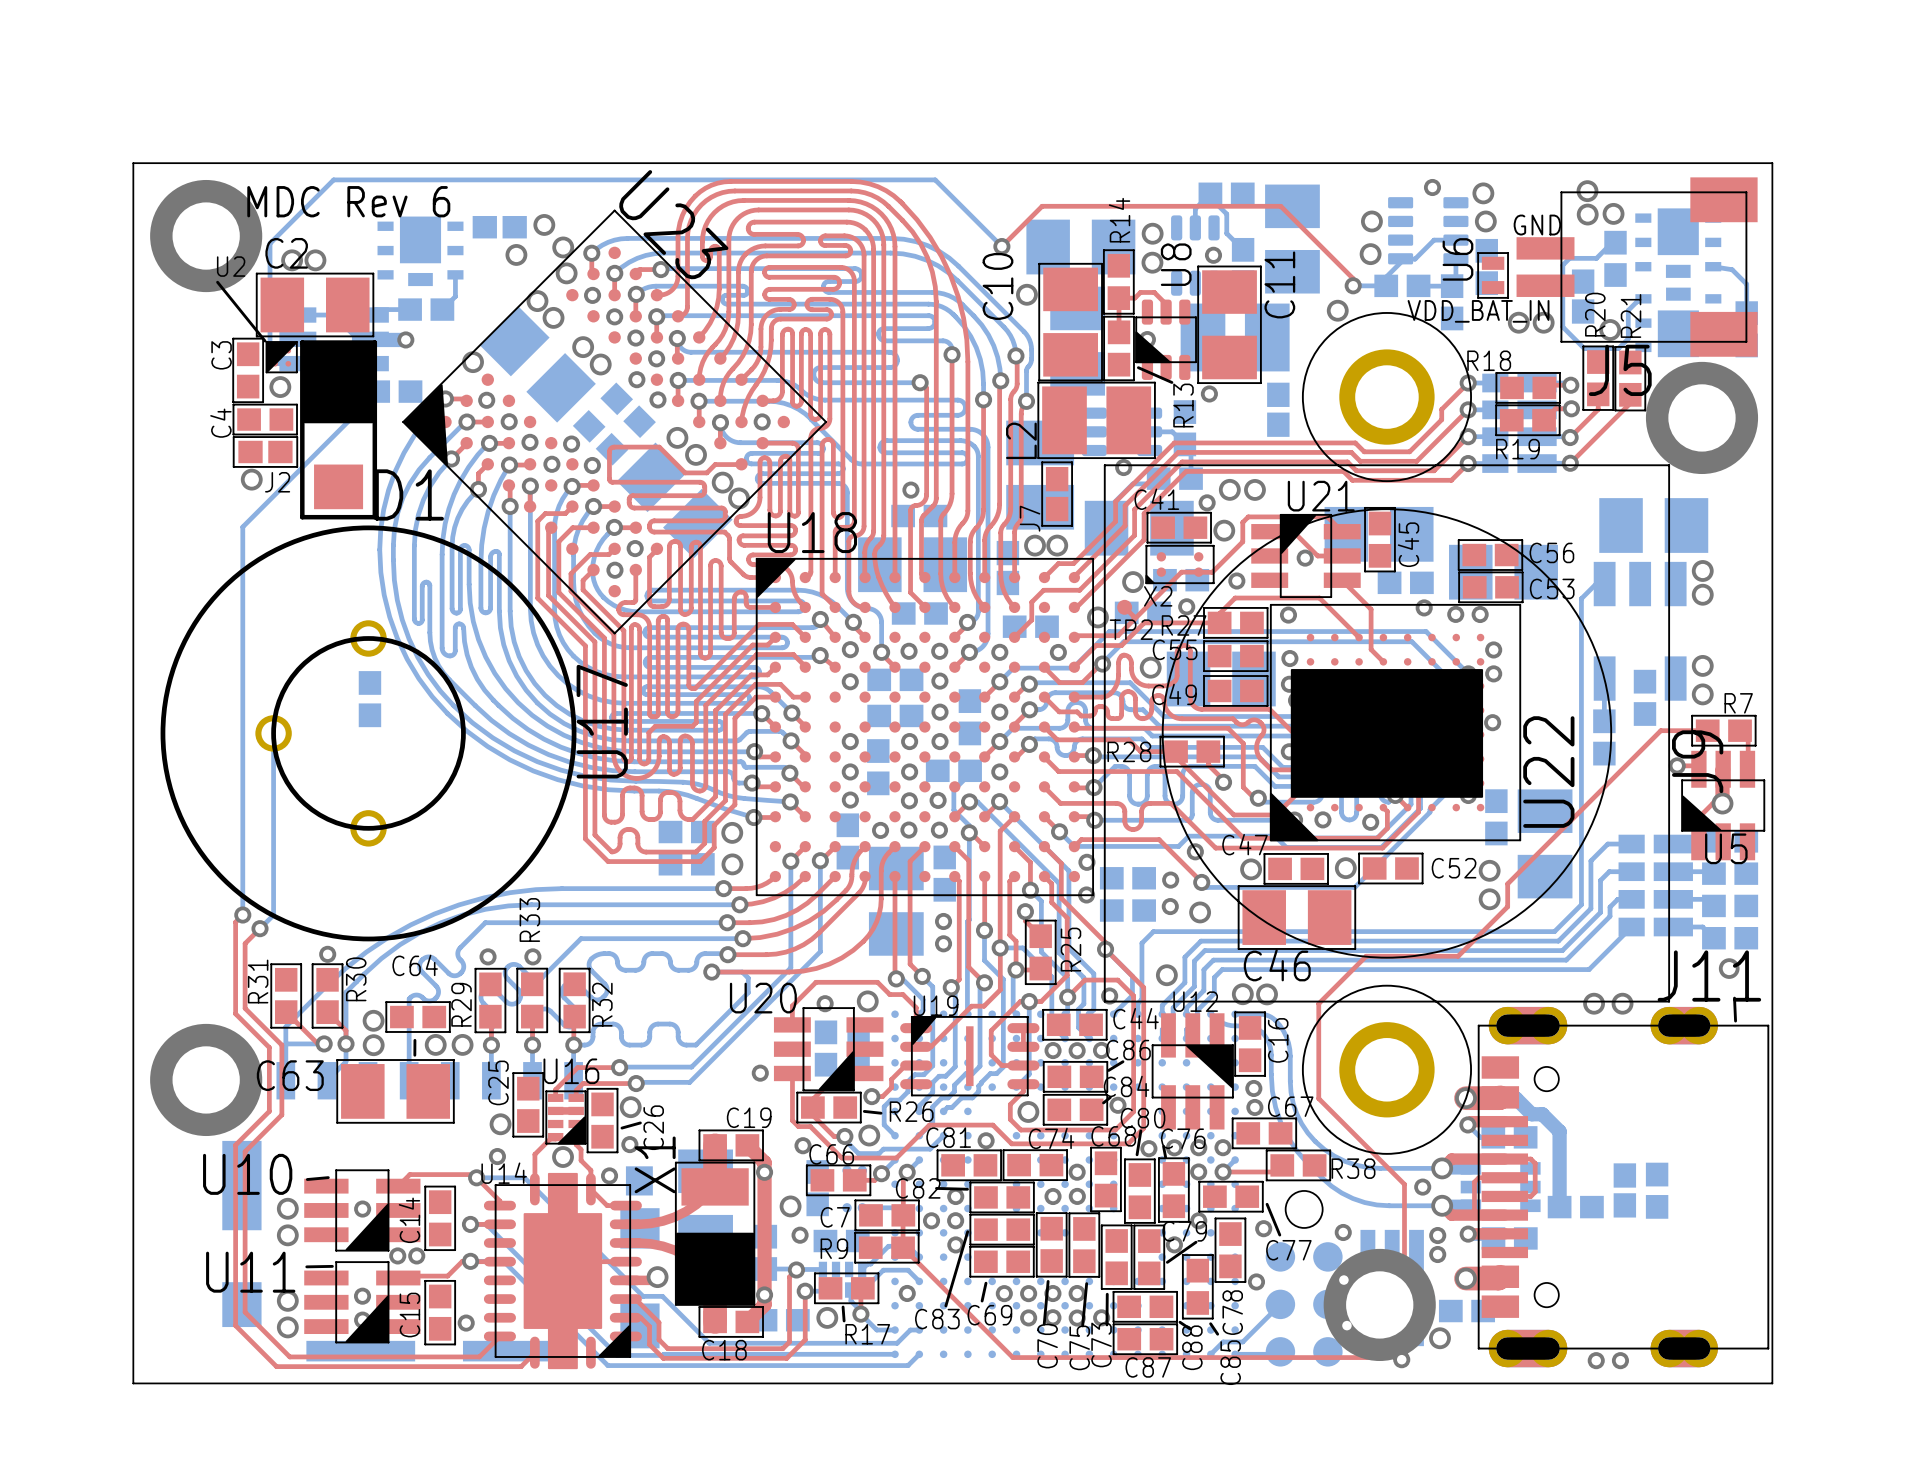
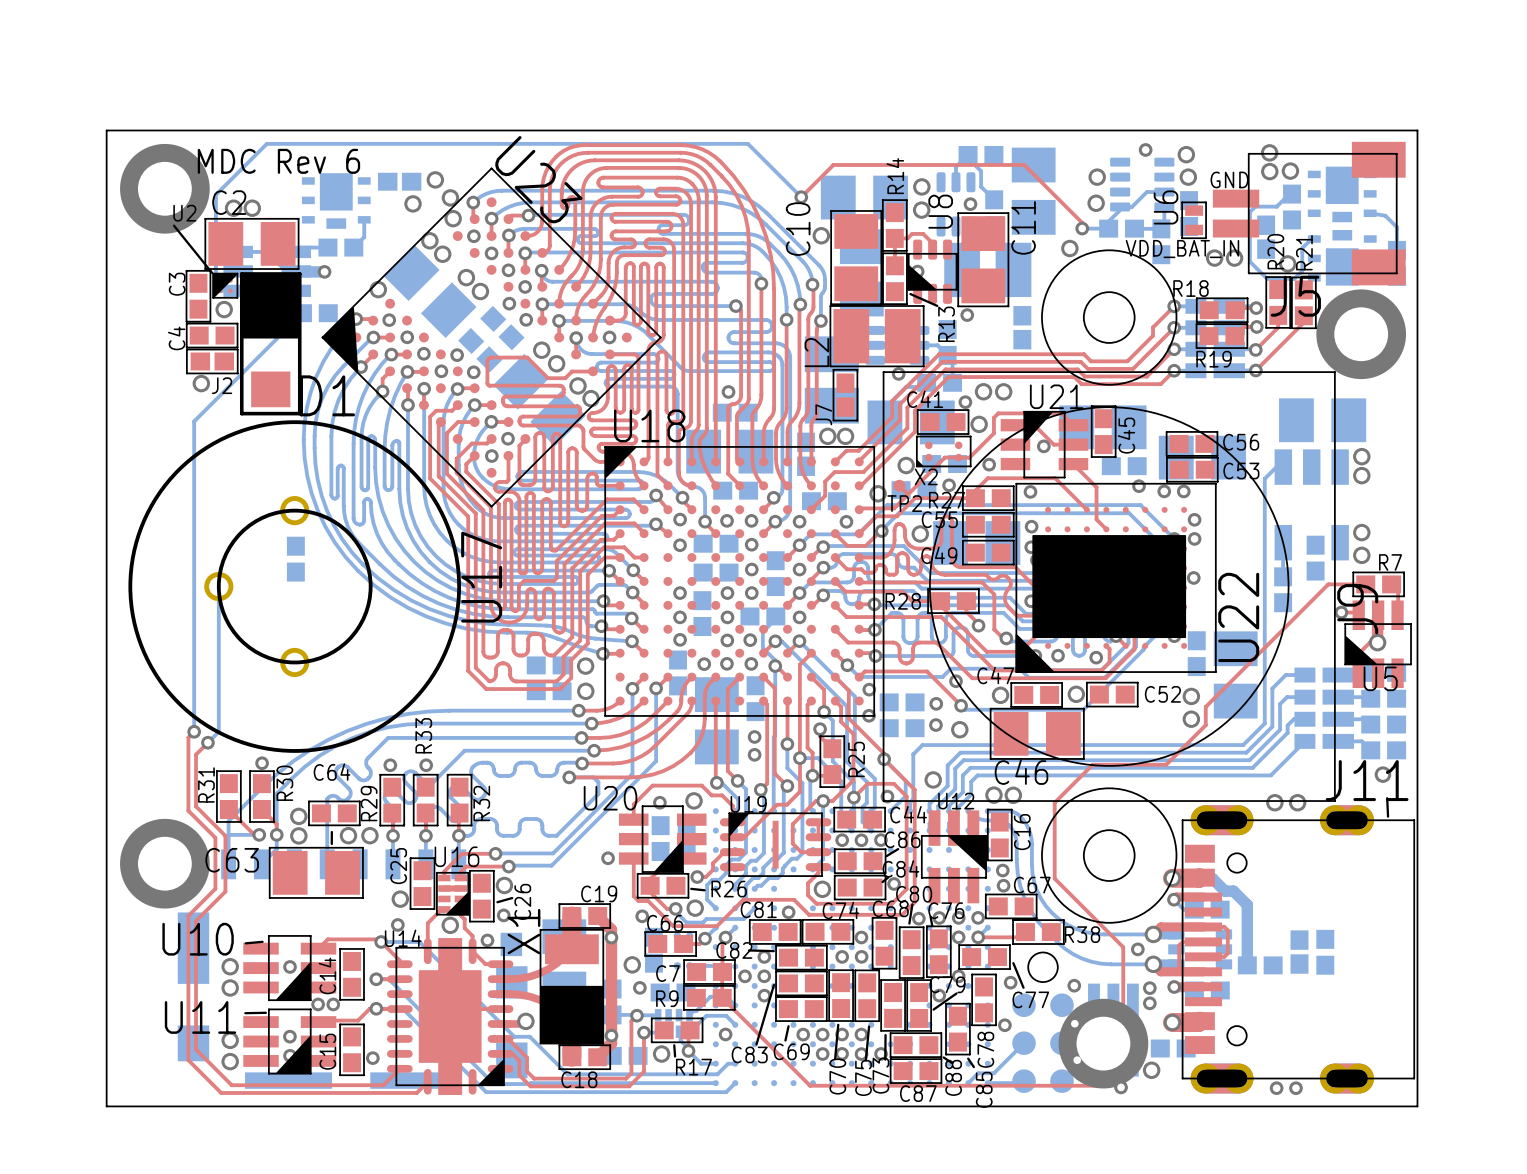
J9 footprint: [1103, 312, 1671, 1155] -> [882, 249, 1336, 924]

